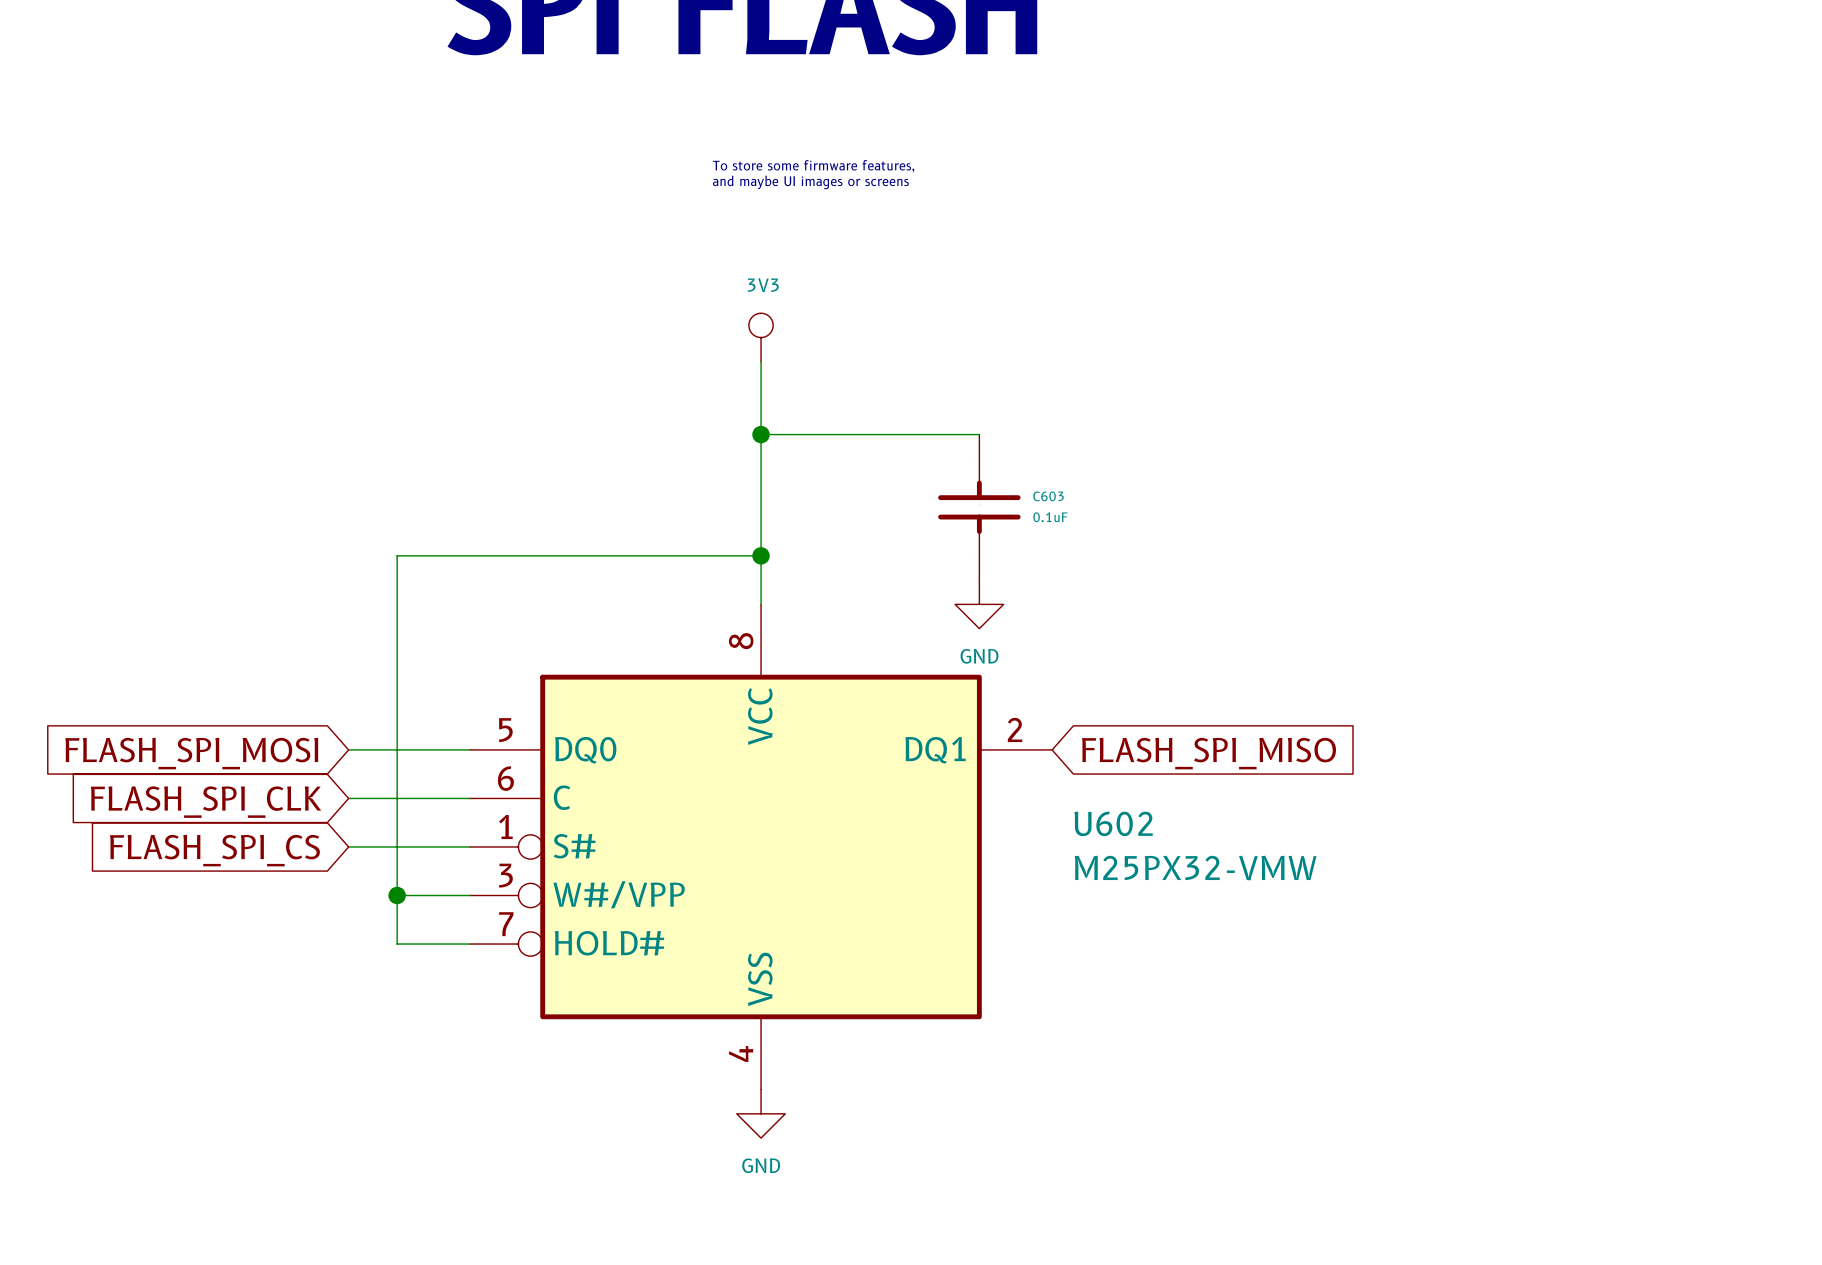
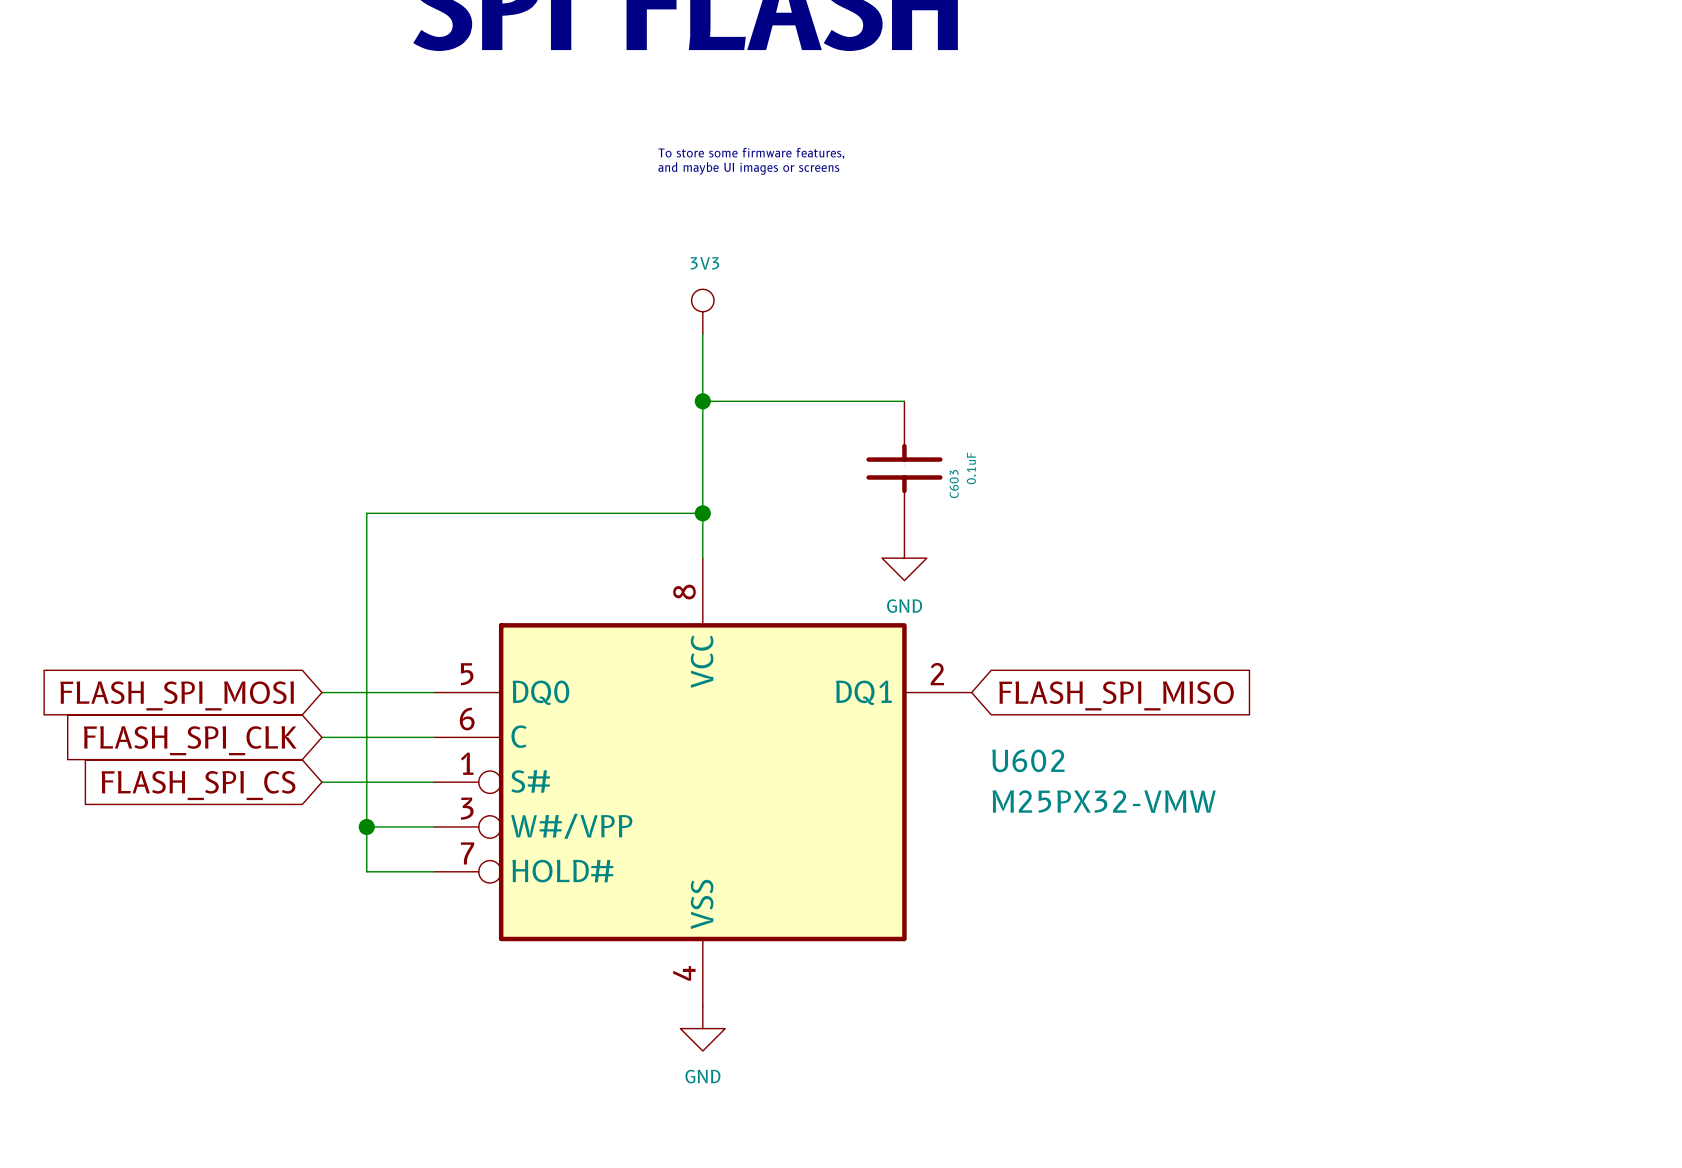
C603 name rotation: 0° (1048, 496) -> 90° counterclockwise (954, 484)
C603 value rotation: 0° (1050, 517) -> 90° counterclockwise (971, 468)

